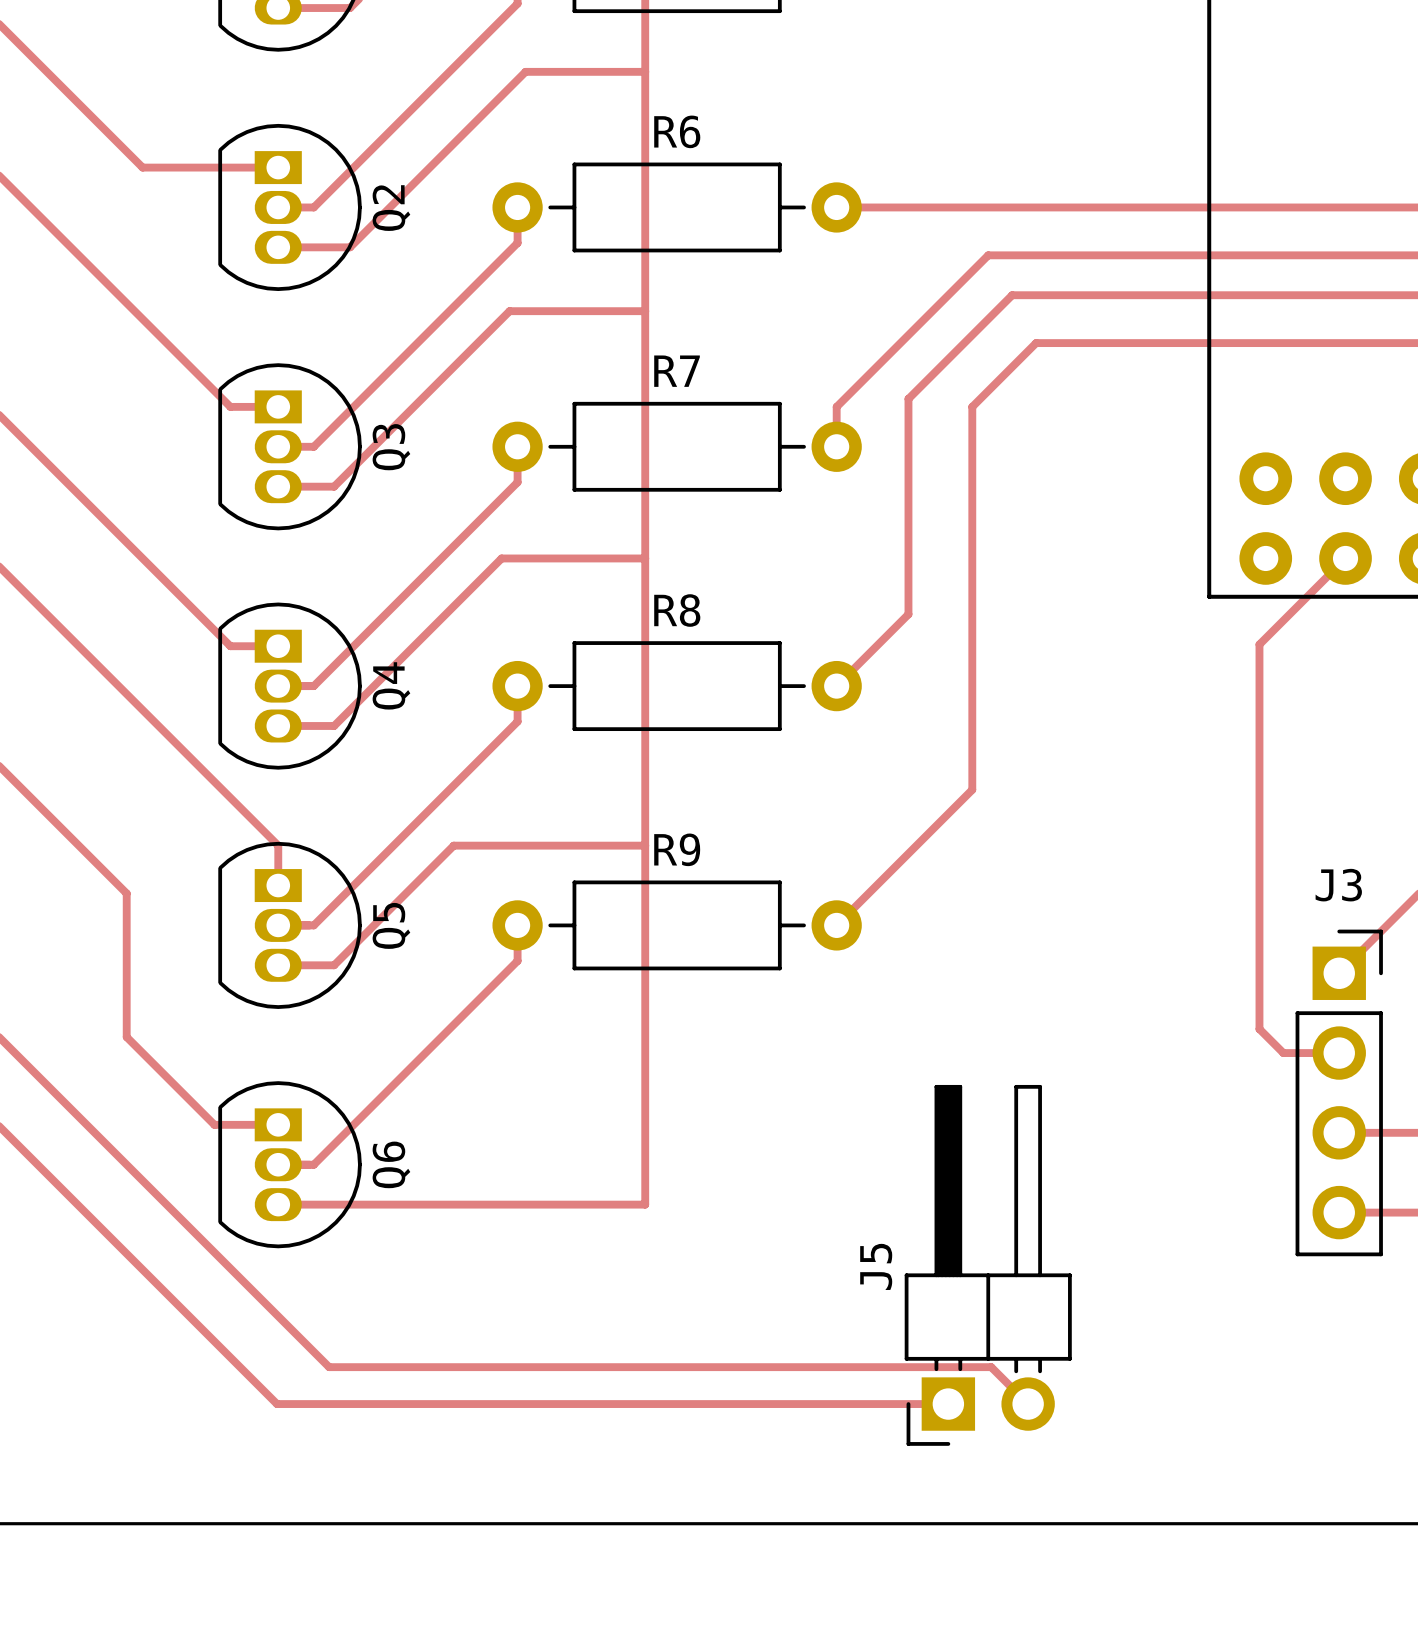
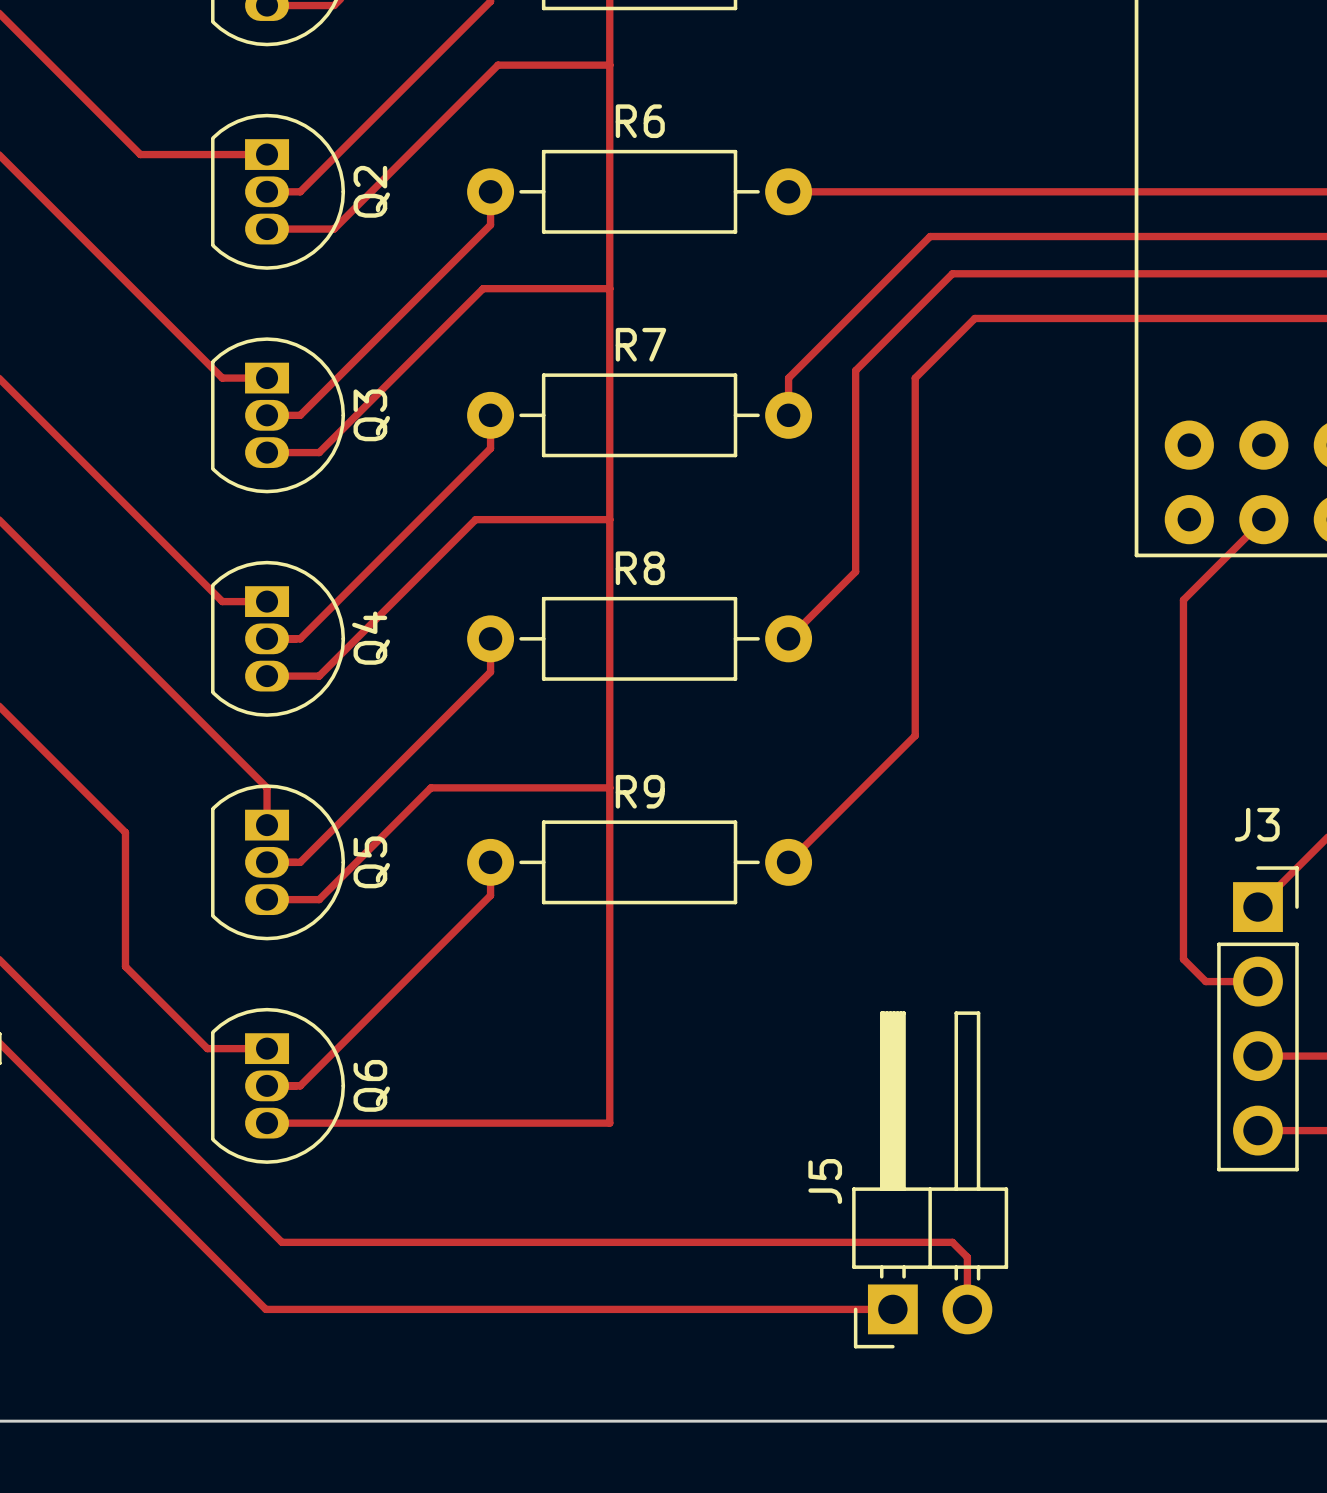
top track: (294, 1332) (329, 1367) (991, 1367) (1028, 1404) -> (281, 1242) (952, 1242) (967, 1257) (967, 1309)

